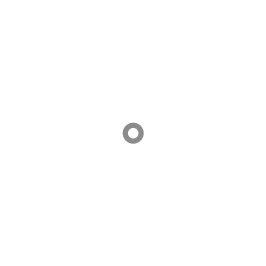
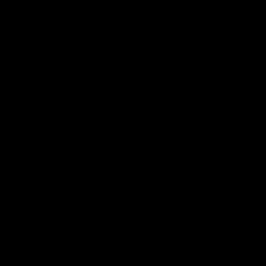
via: (133, 133) -> none

